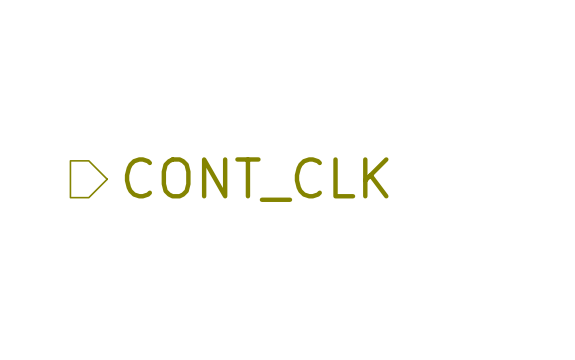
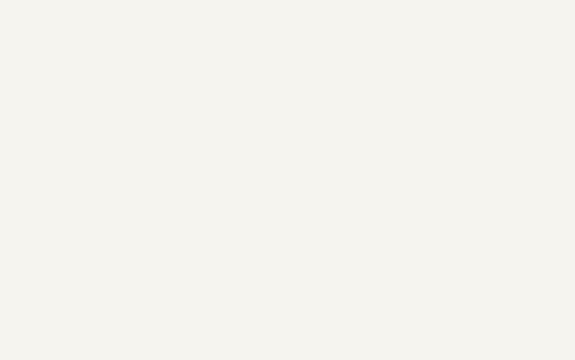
hierarchical label: CONT_CLK (256, 179) -> none

